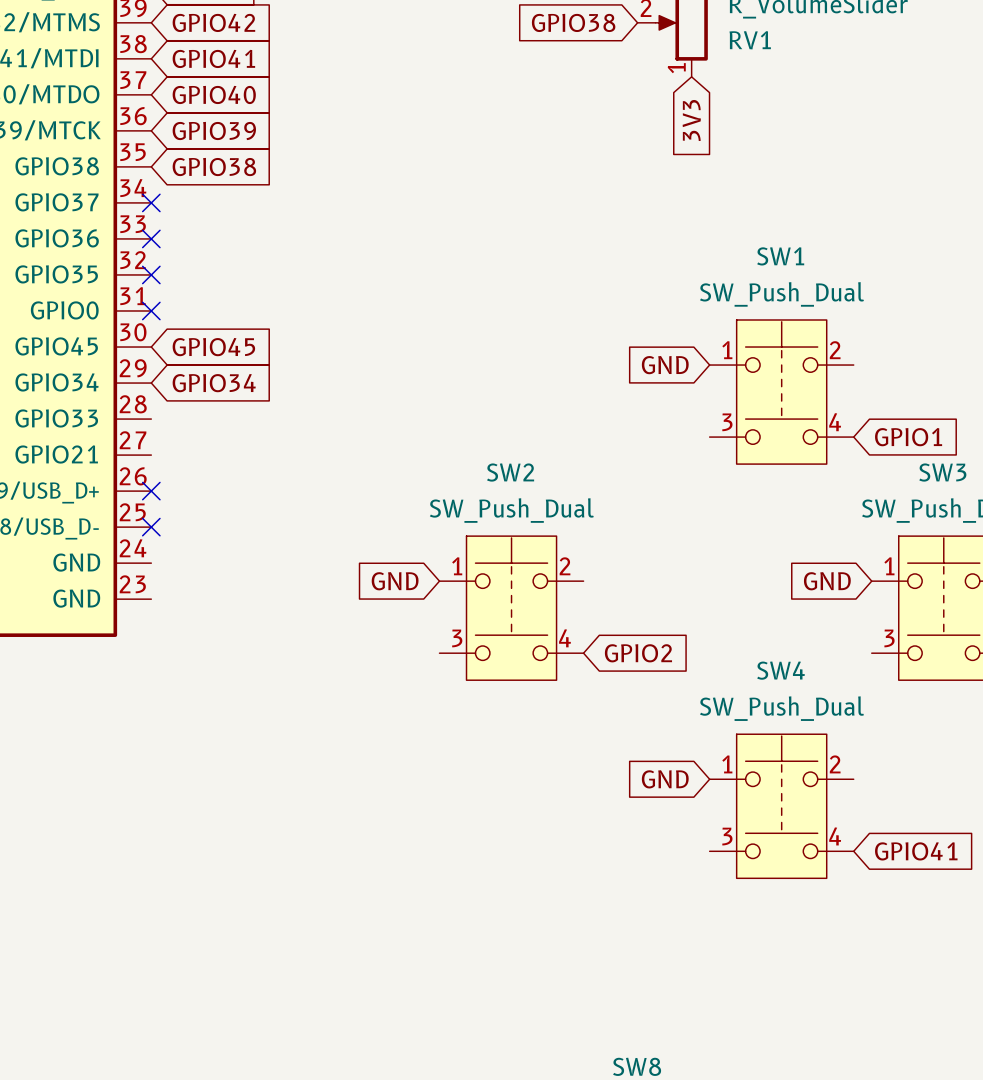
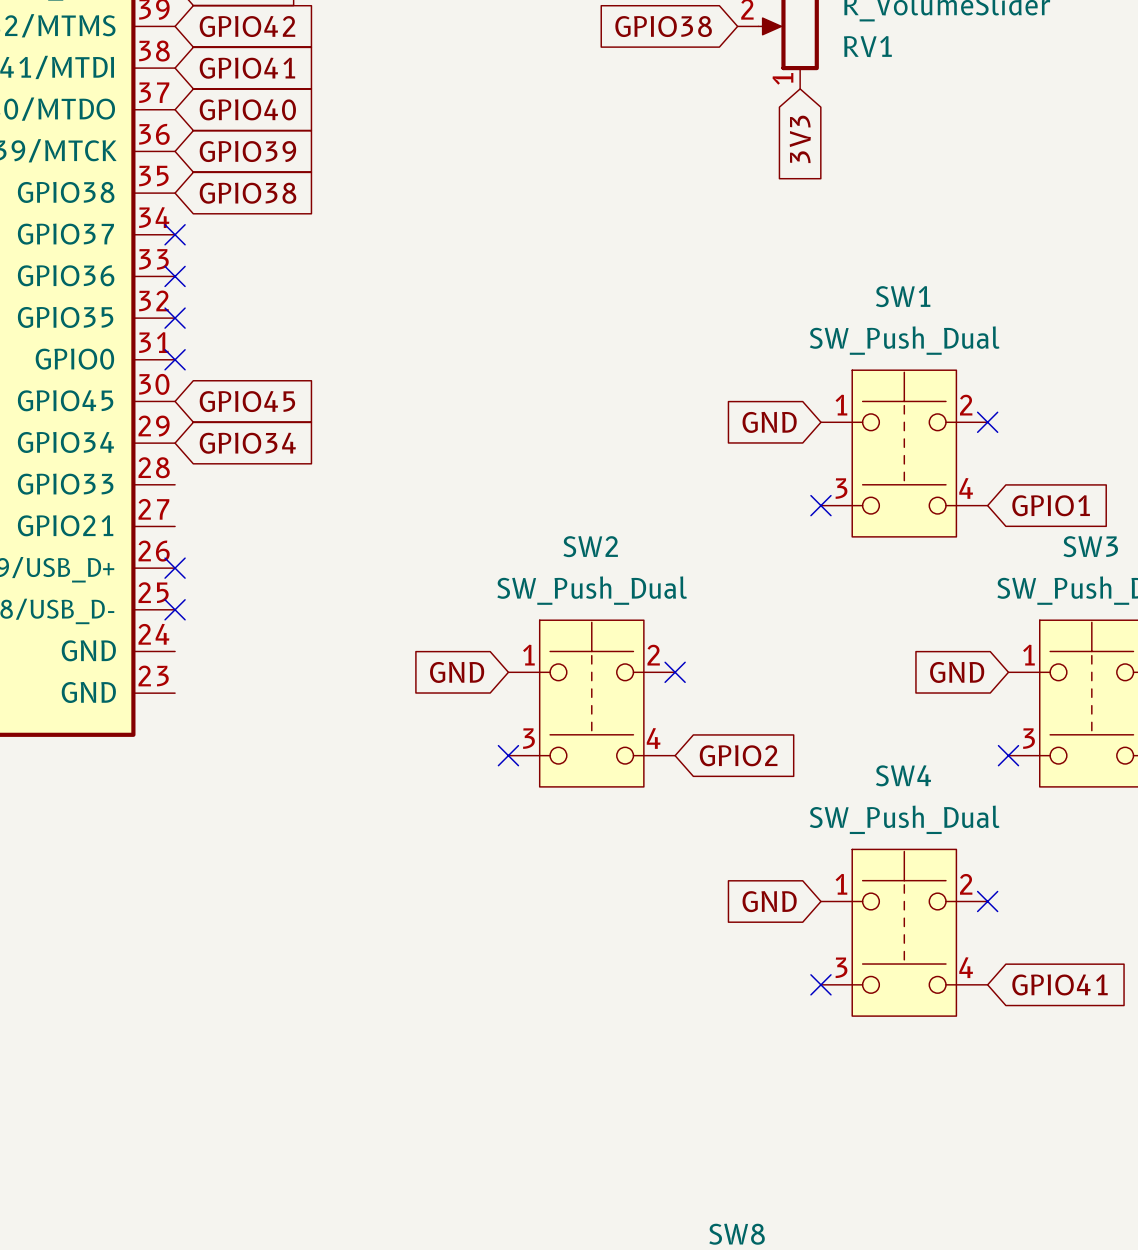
no-connect mark: none -> (987, 422)
no-connect mark: none -> (820, 505)
no-connect mark: none -> (675, 672)
no-connect mark: none -> (508, 755)
no-connect mark: none -> (1008, 755)
no-connect mark: none -> (987, 901)
no-connect mark: none -> (820, 984)

